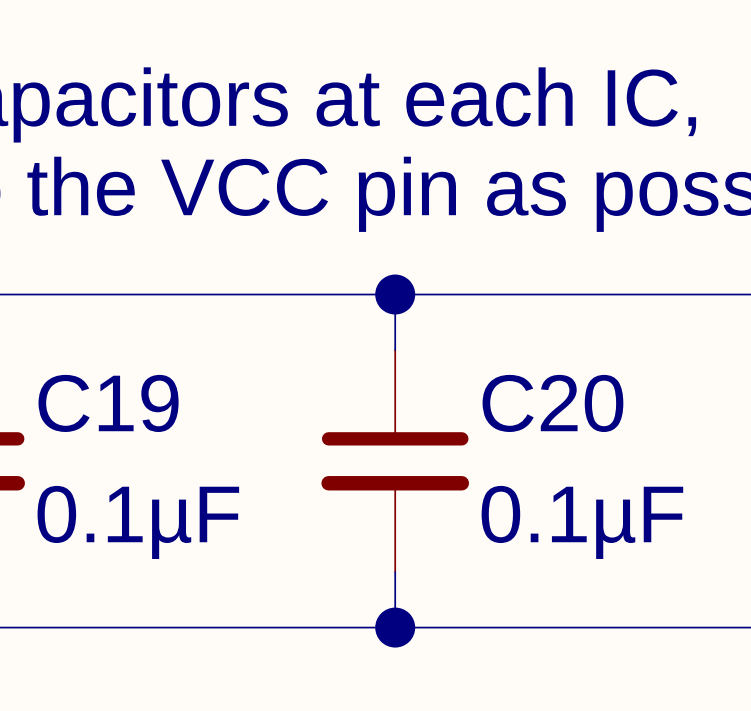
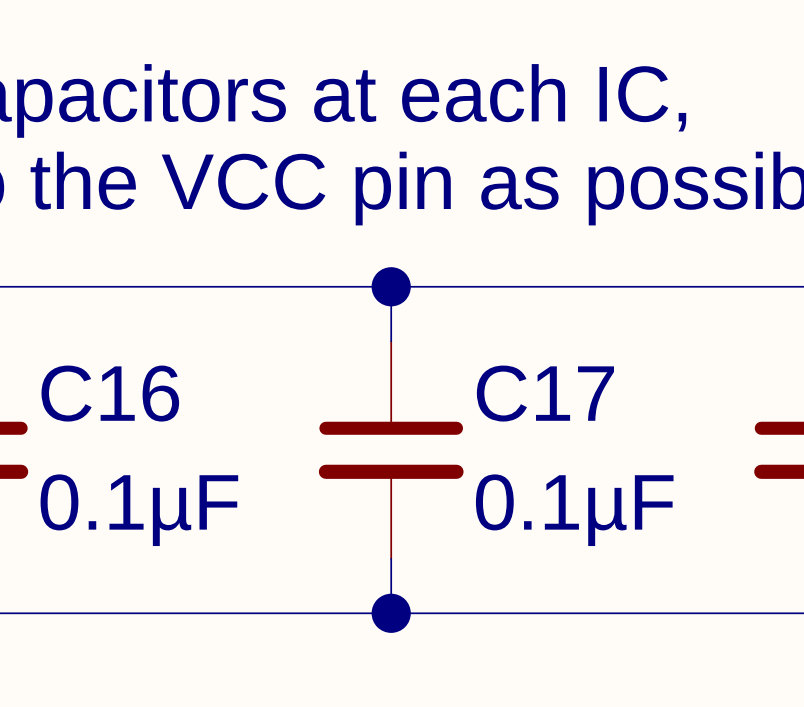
C19 name: C19 (108, 403) -> C16 (110, 393)
C20 name: C20 (552, 403) -> C17 (545, 393)

